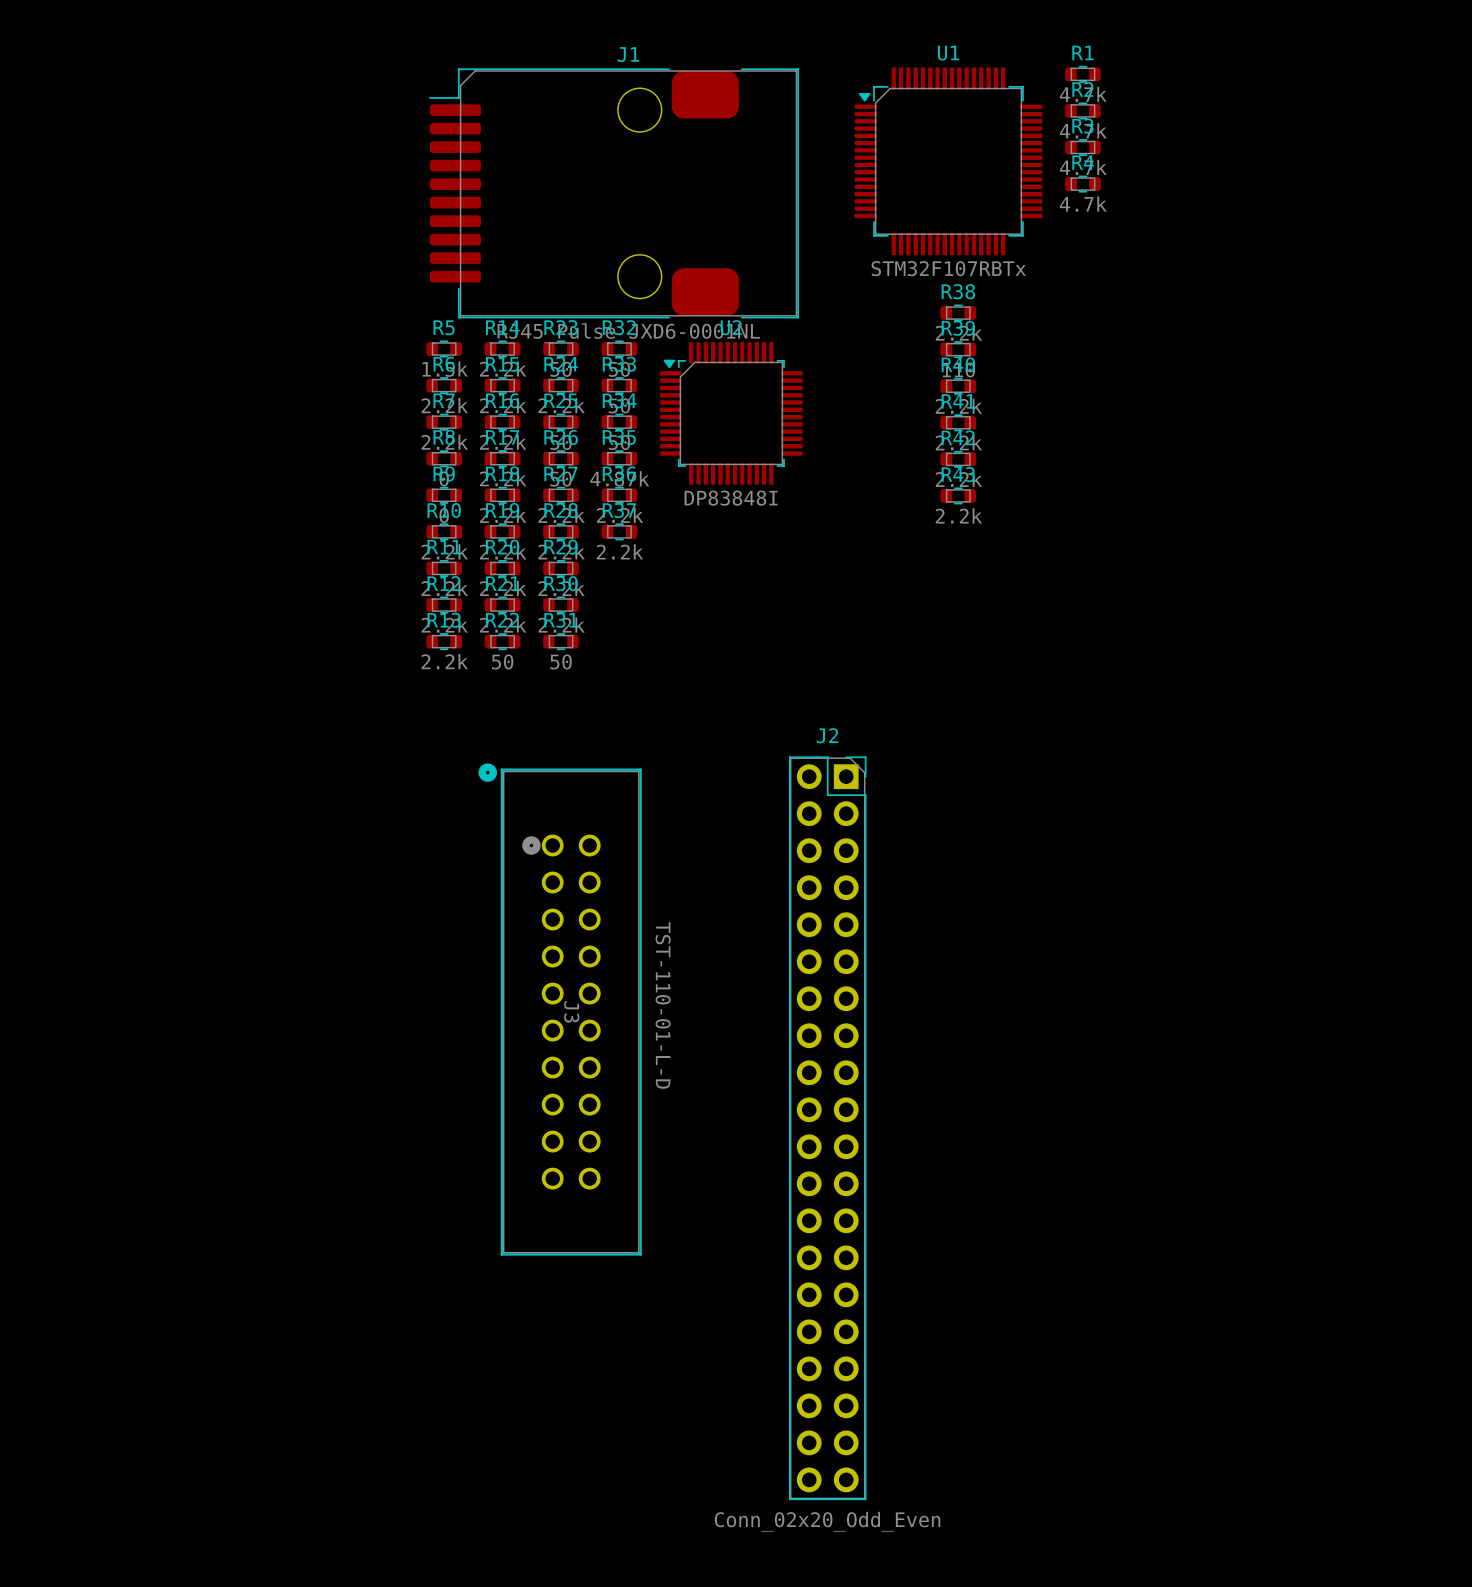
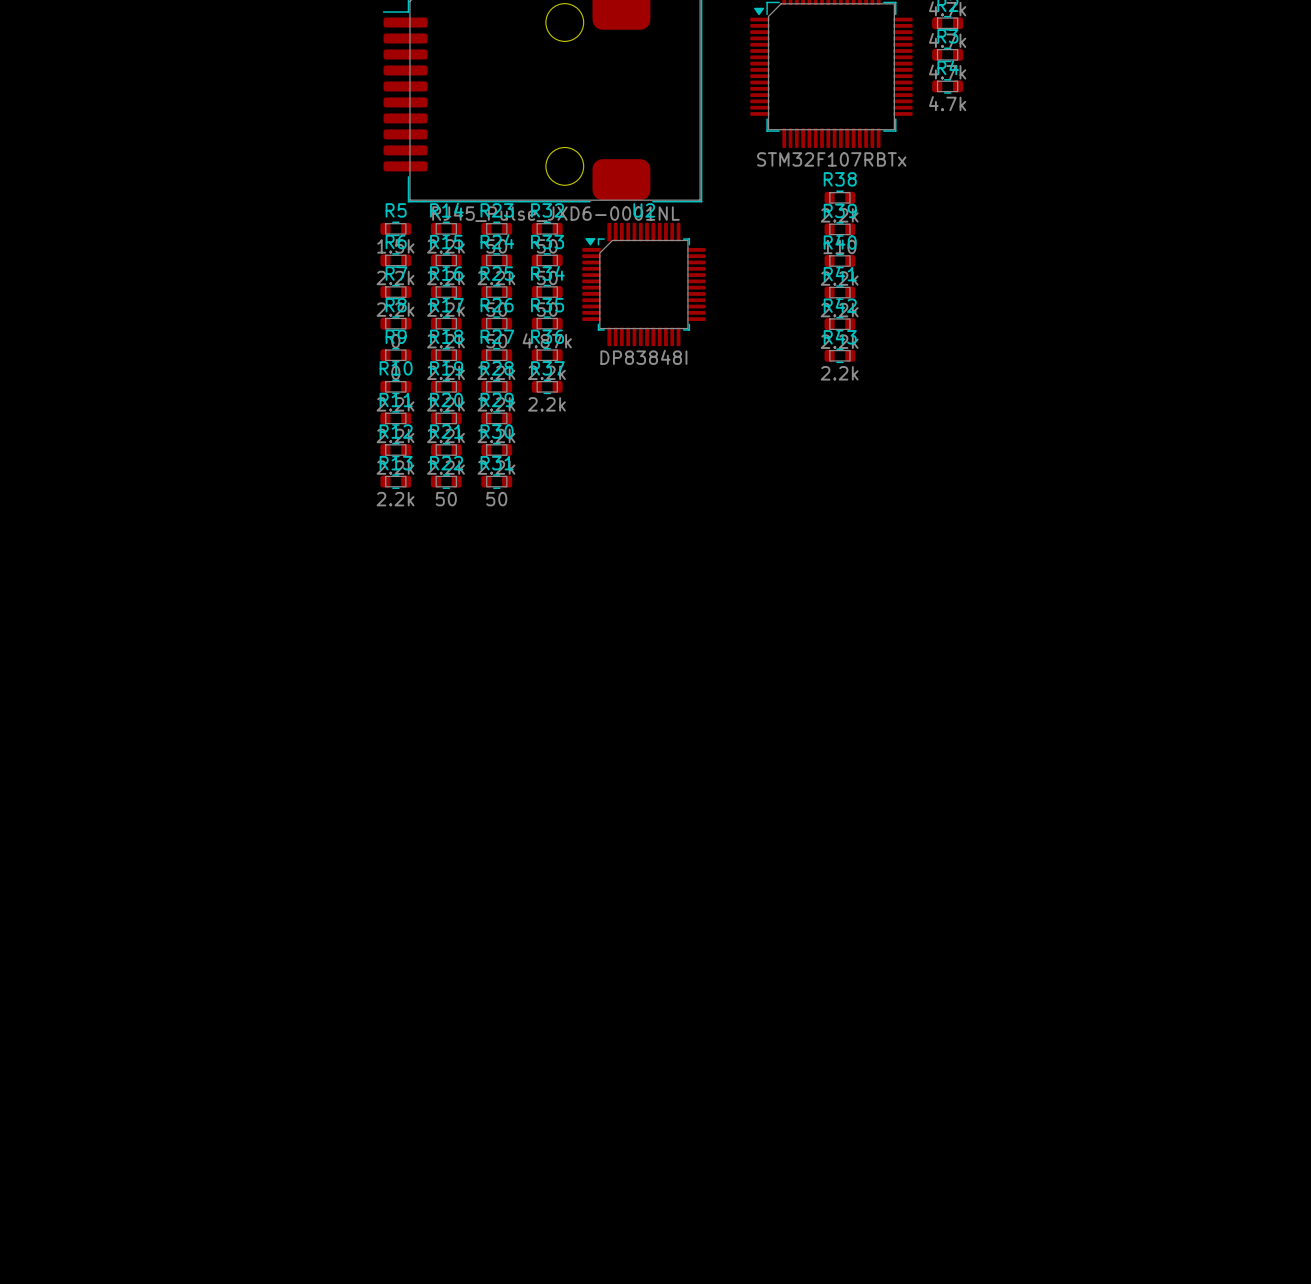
J3: TST-110-01-L-D (560, 1009) -> none
J2: Conn_02x20_Odd_Even (827, 1128) -> none

